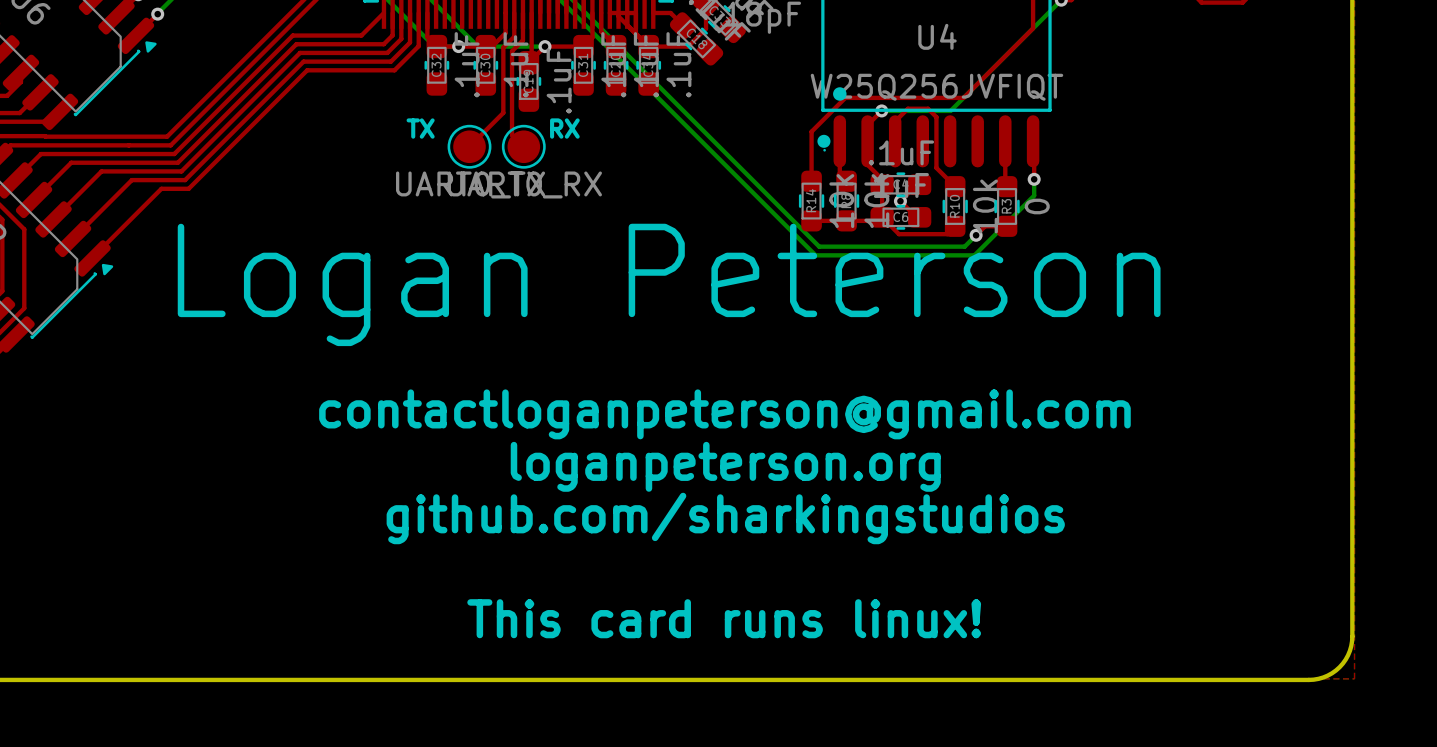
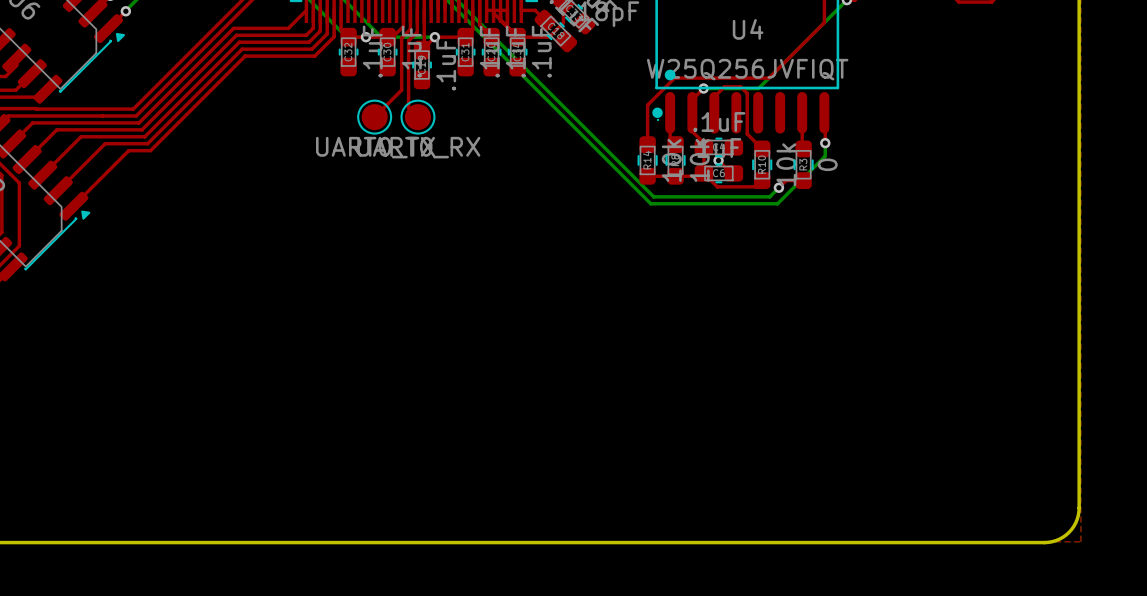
text: TX (420, 128) -> none
text: RX (564, 128) -> none
text: Logan Peterson (669, 284) -> none
text: contactloganpeterson@gmail.com (724, 414) -> none
text: loganpeterson.org (725, 466) -> none
text: github.com/sharkingstudios (725, 518) -> none
text: This card runs linux! (724, 618) -> none

